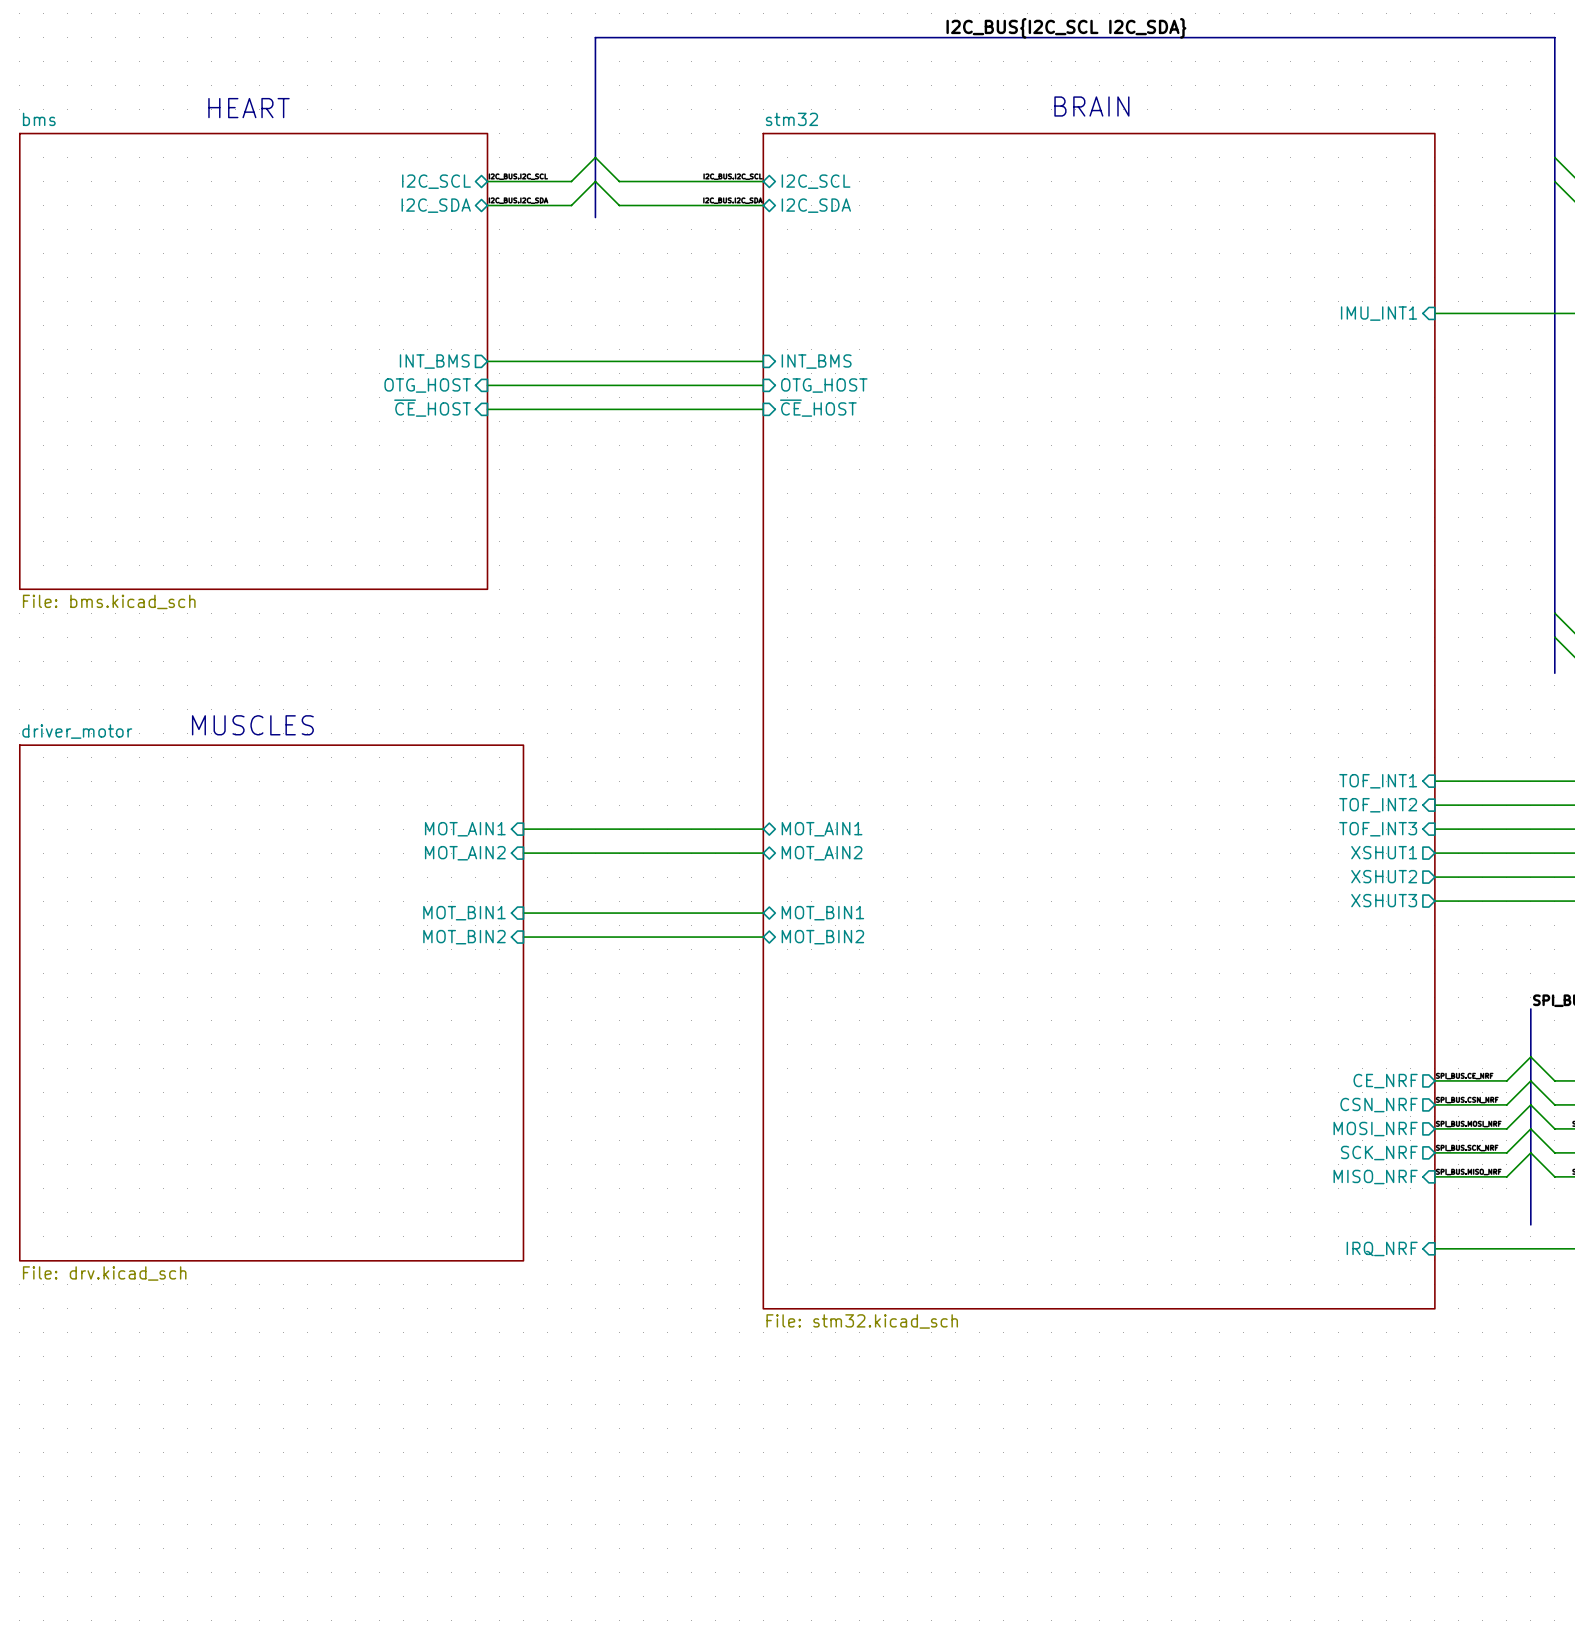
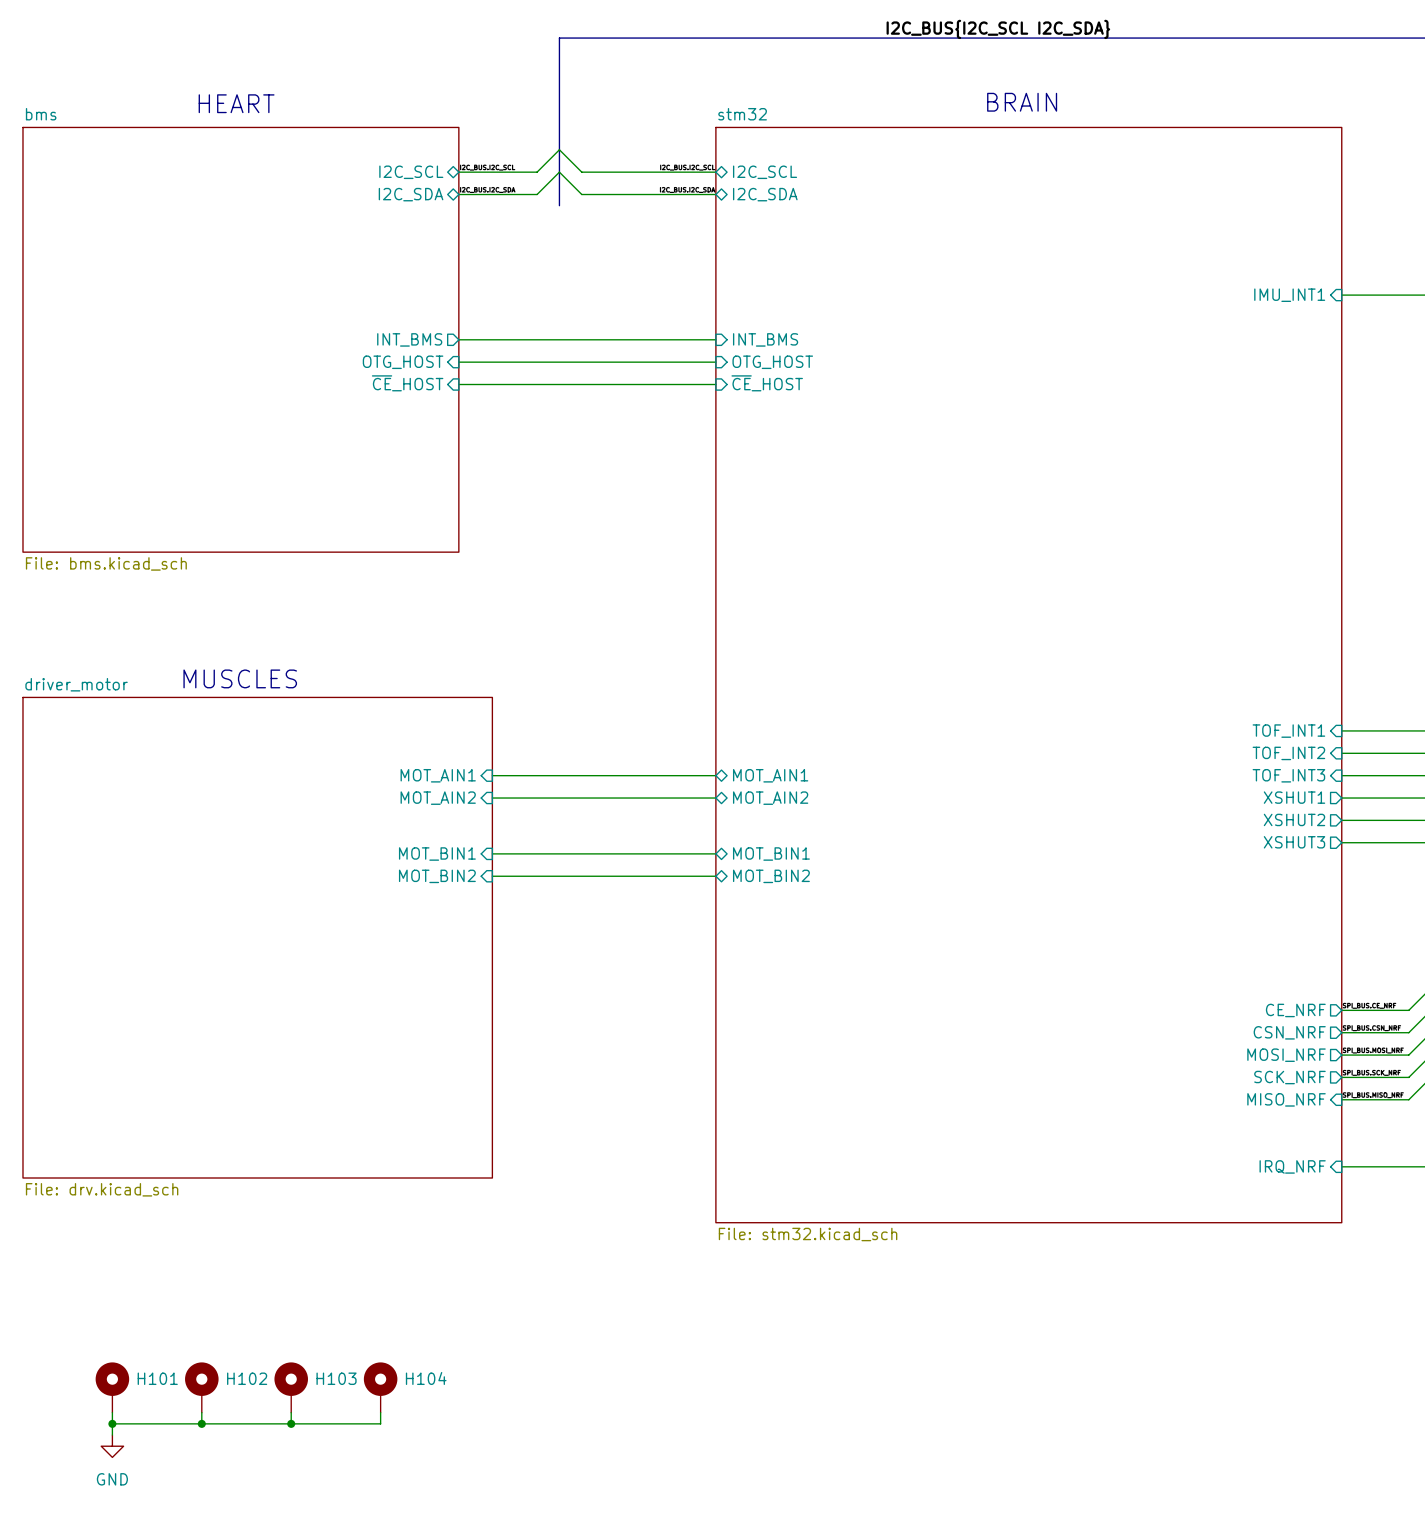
H101: none -> (112, 1387)
H102: none -> (201, 1387)
H103: none -> (291, 1387)
H104: none -> (380, 1387)
wire: none -> (112, 1412) (112, 1435)
wire: none -> (201, 1412) (201, 1423)
wire: none -> (291, 1412) (291, 1423)
wire: none -> (380, 1412) (380, 1423) (112, 1423)
junction: none -> (112, 1423)
junction: none -> (201, 1423)
junction: none -> (291, 1423)
power symbol: none -> GND (112, 1446)

